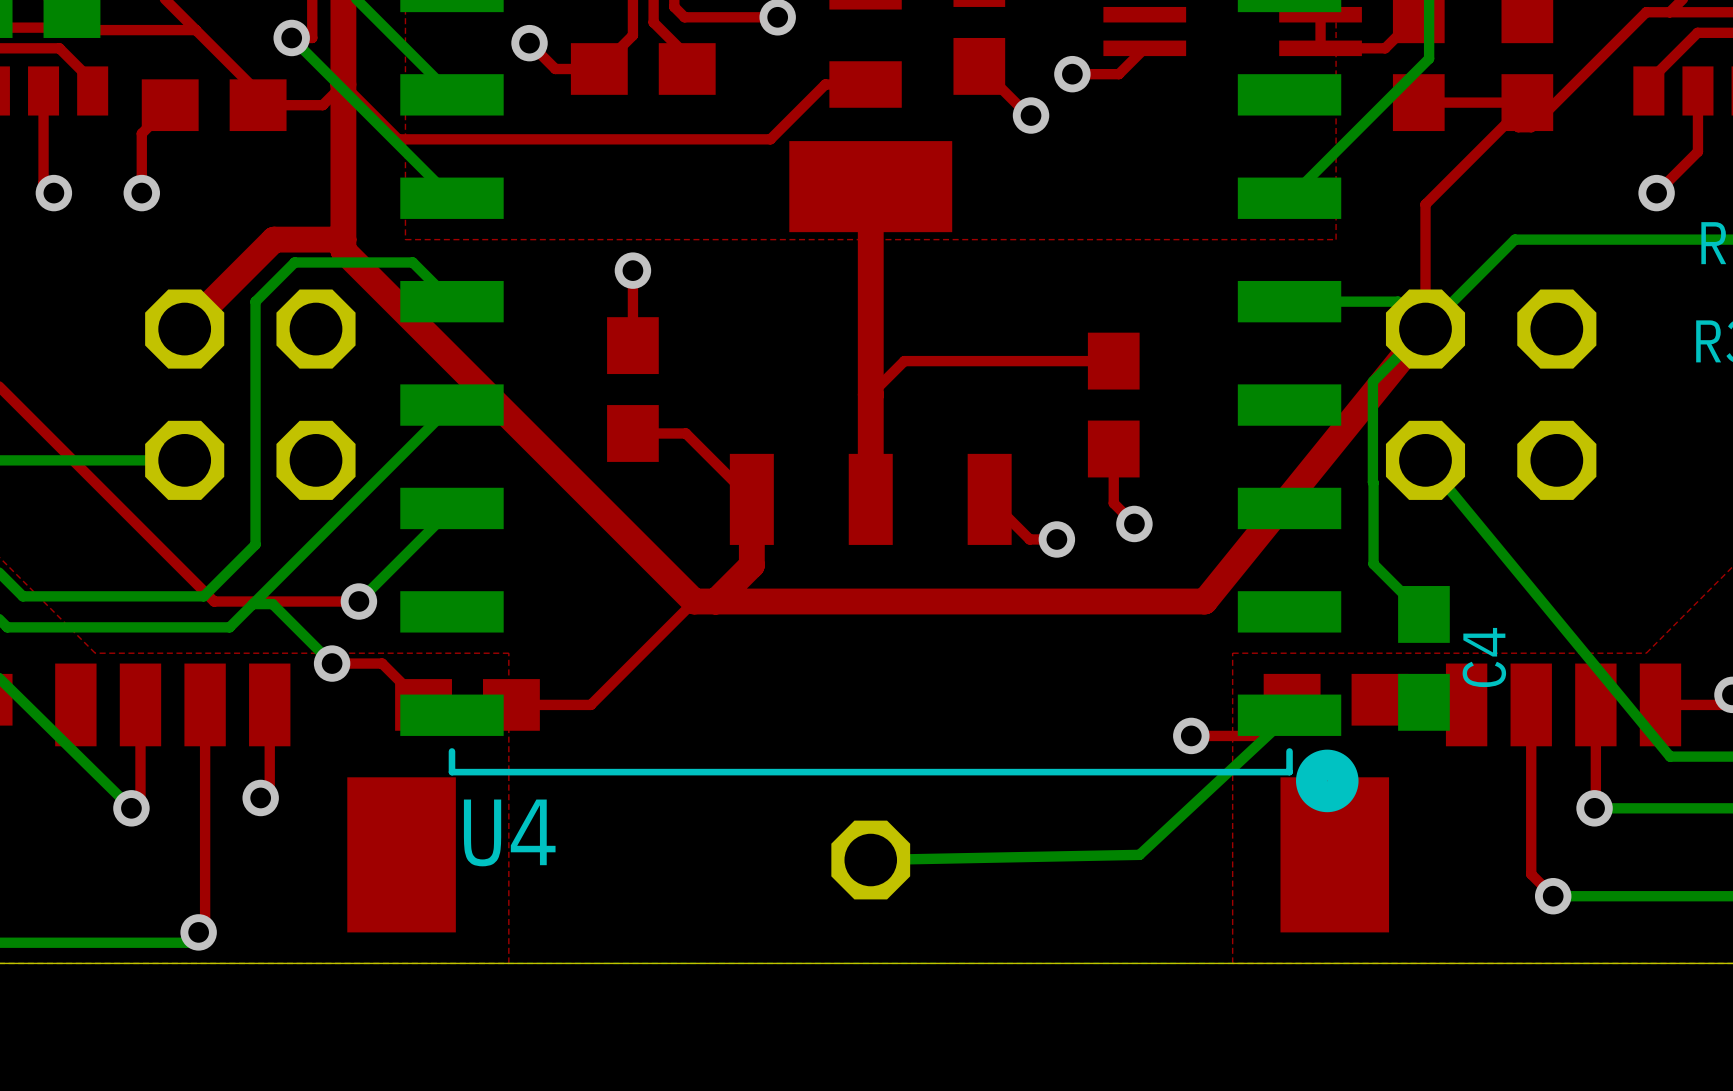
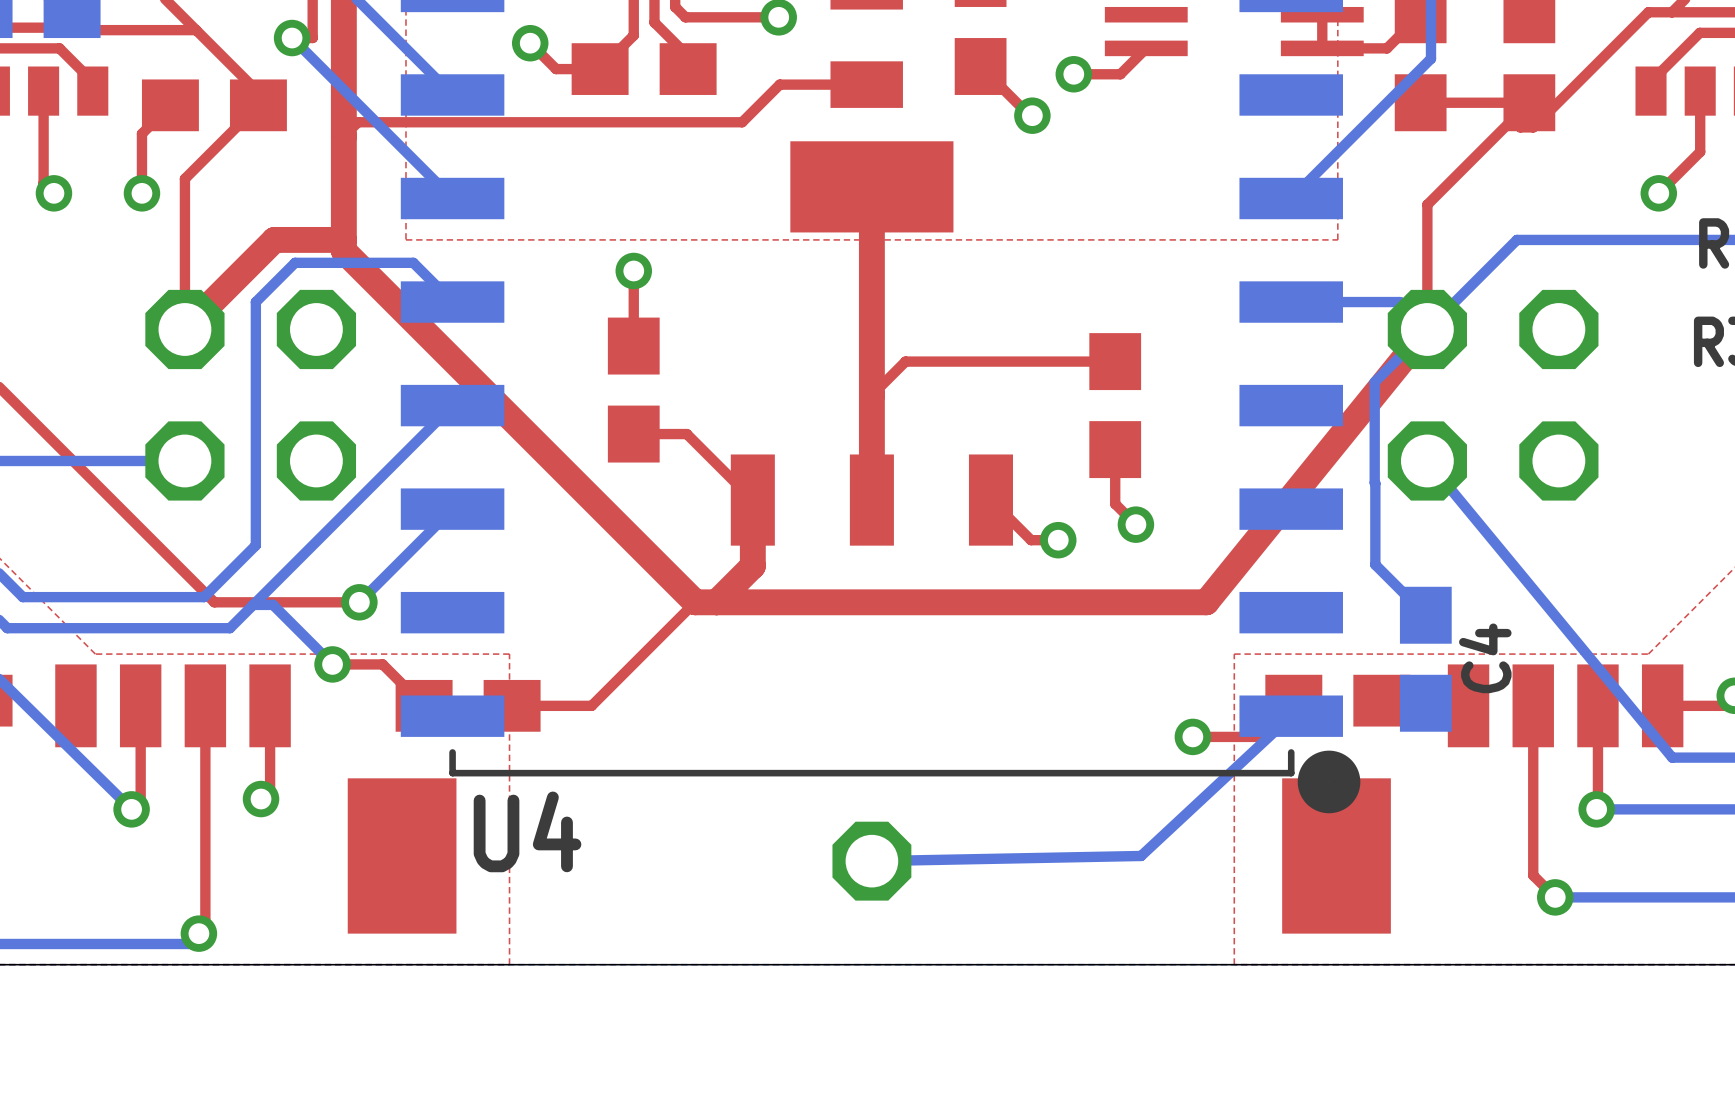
top track: (825, 84) (770, 139) (398, 139) (343, 84) (322, 105) (258, 105) -> (826, 84) (779, 84) (742, 122) (357, 122) (343, 136)
top track: none -> (258, 105) (184, 178) (184, 329)

